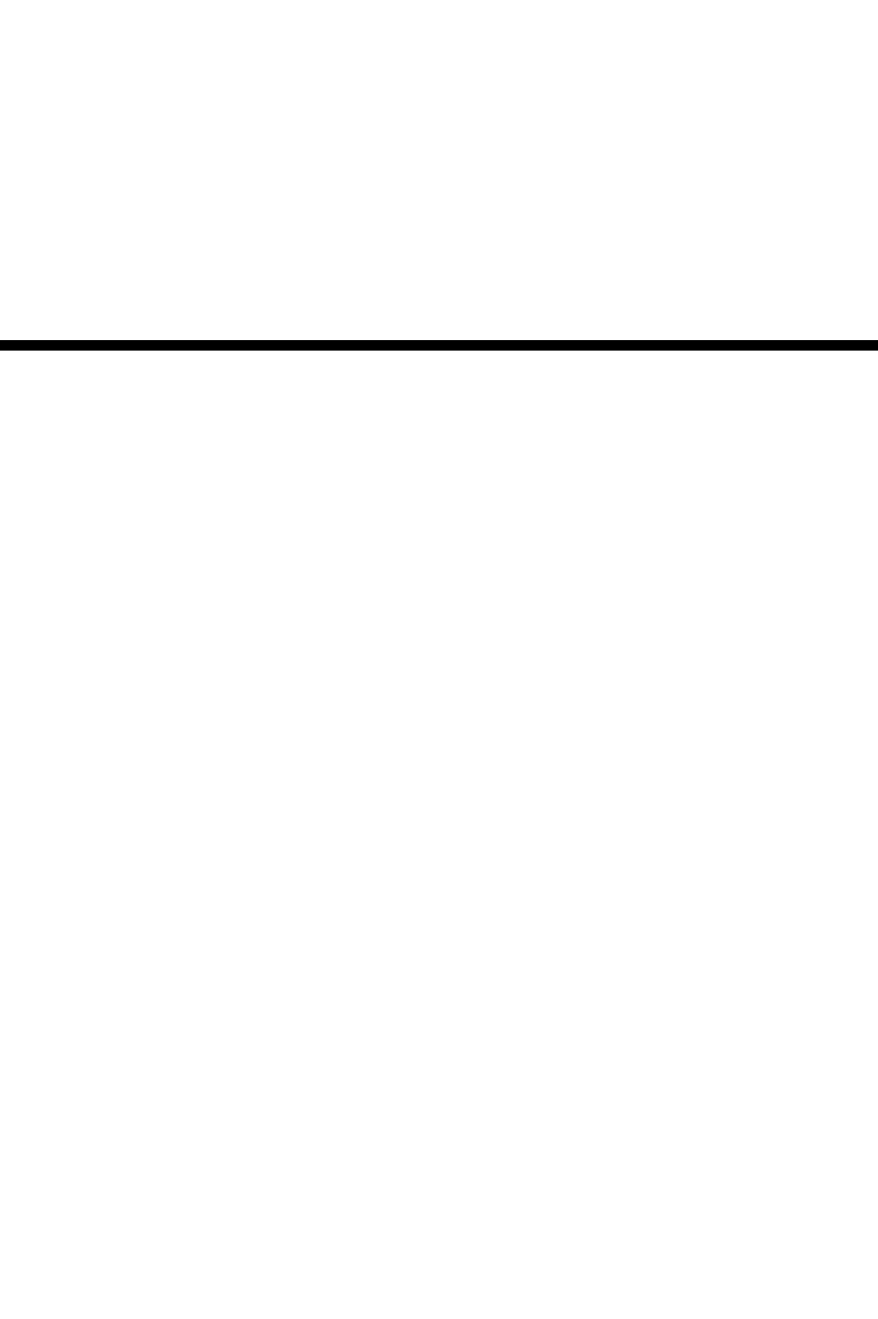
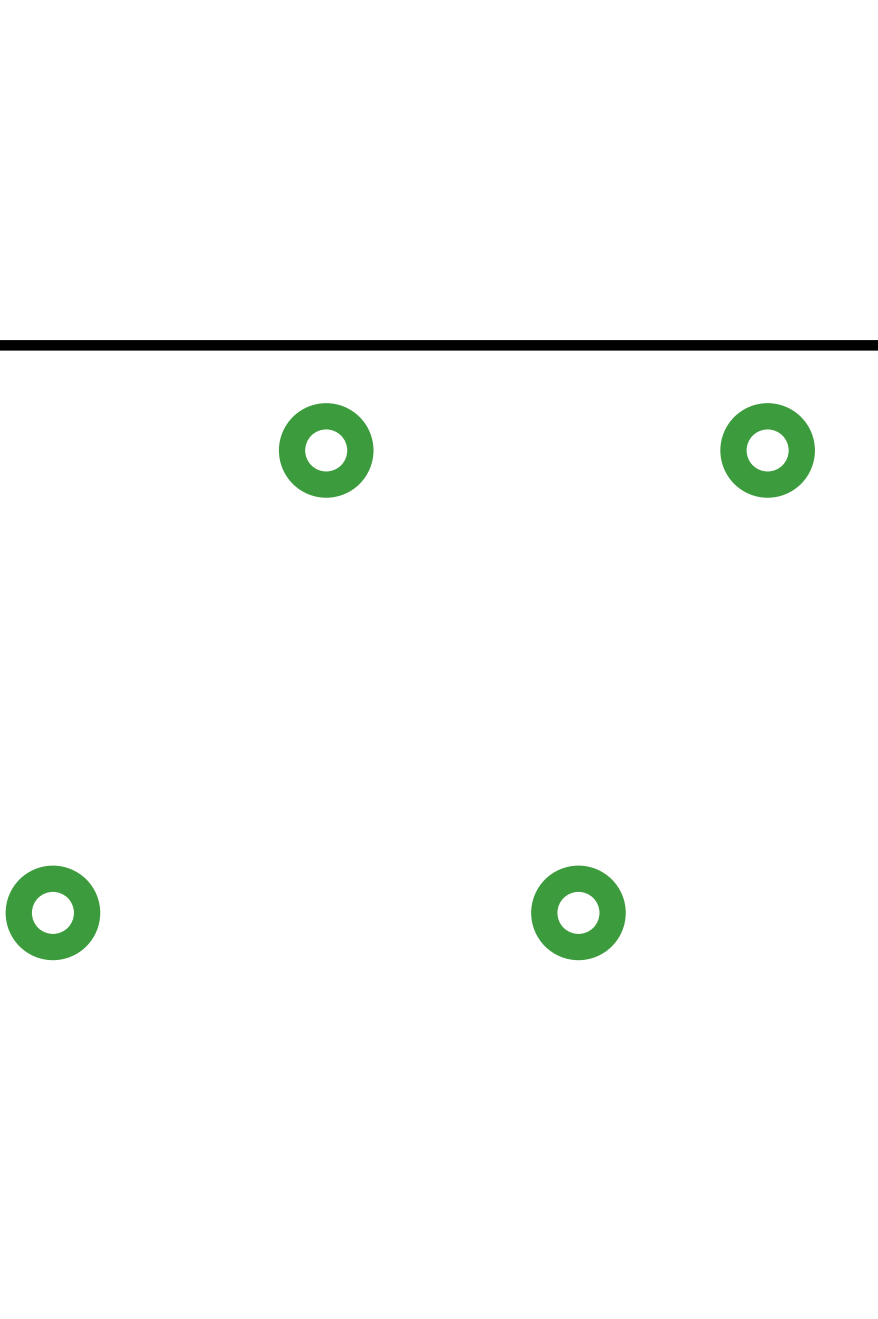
via: none -> (326, 450)
via: none -> (767, 450)
via: none -> (52, 912)
via: none -> (578, 912)

